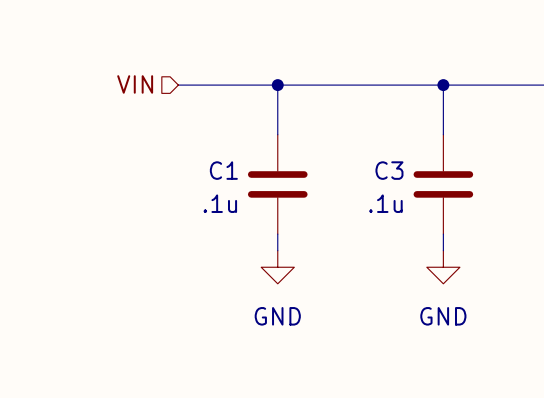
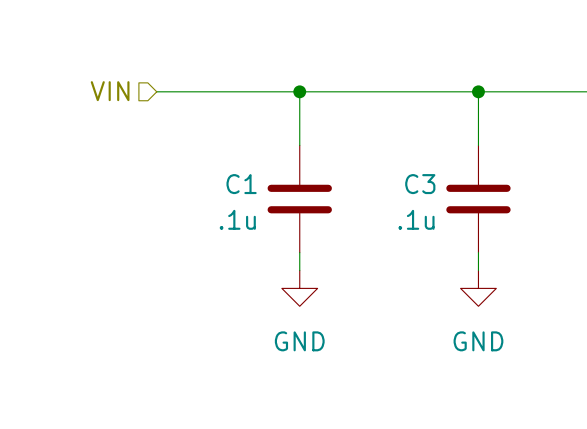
hierarchical label position: VIN (135, 84) -> VIN (110, 91)
wire: none -> (156, 91) (192, 91)

